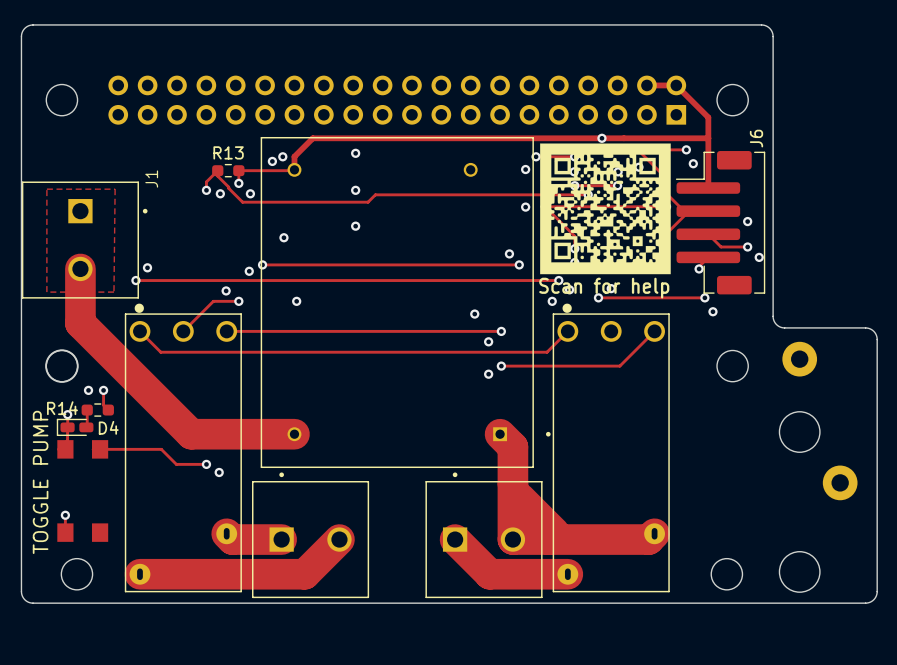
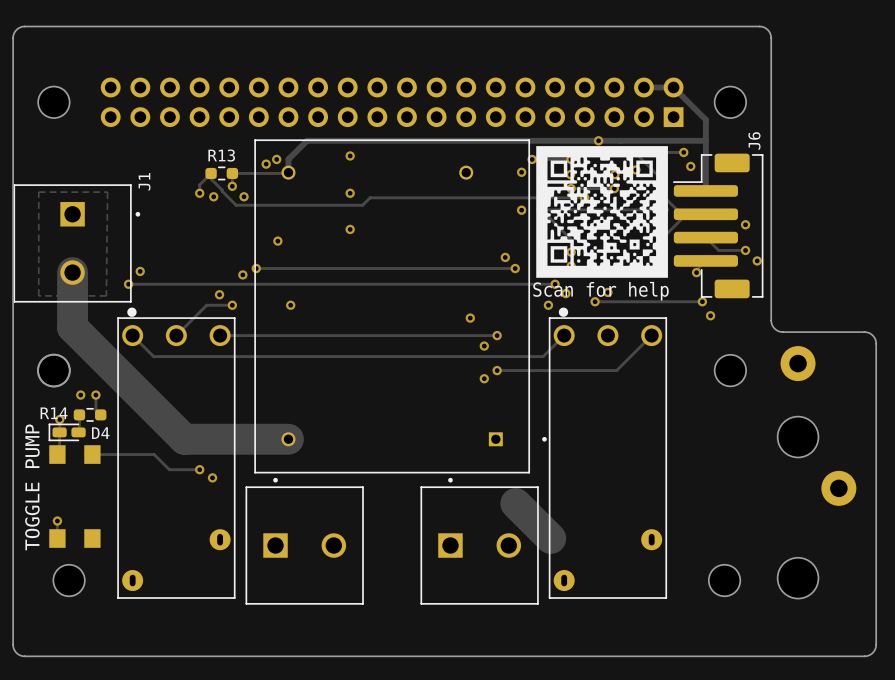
track: (500, 434) (512, 447) (512, 539) (648, 539) (654, 533) -> none
track: (226, 533) (232, 539) (281, 539) -> none
track: (339, 539) (304, 574) (139, 574) -> none
track: (455, 539) (489, 574) (567, 574) -> none
board edge: (21, 591) (24, 599) (33, 603) (865, 603) (873, 599) (877, 591) -> (13, 598) (13, 647) (17, 653) (24, 656) (866, 656) (872, 652) (876, 646) (876, 598)

